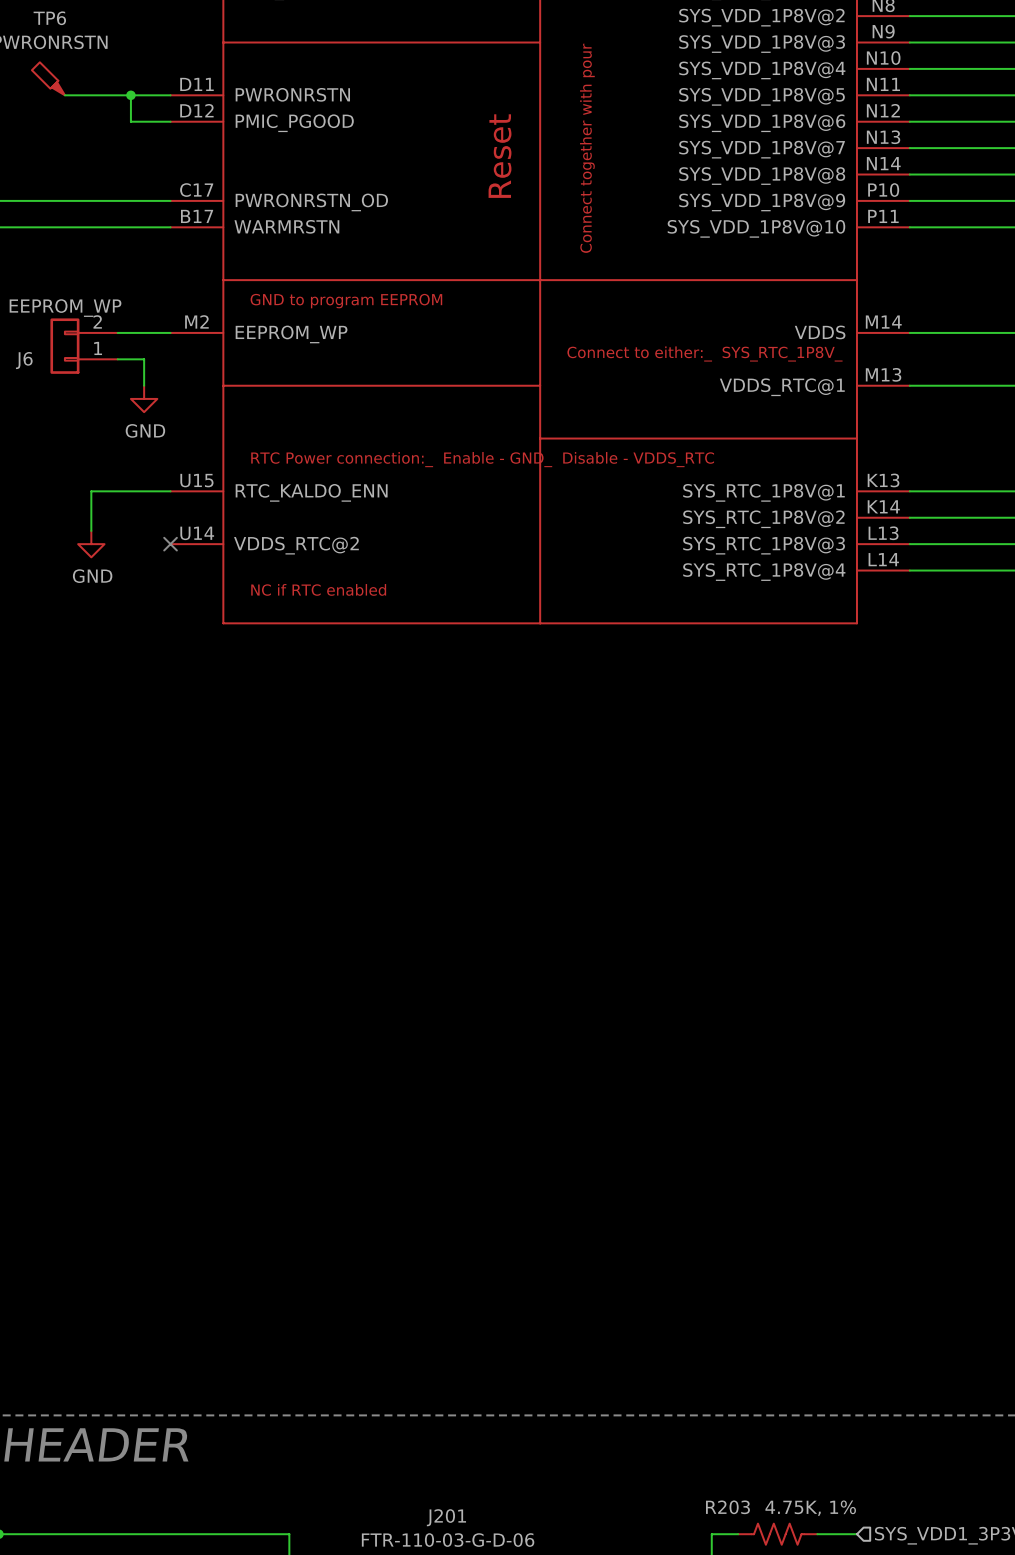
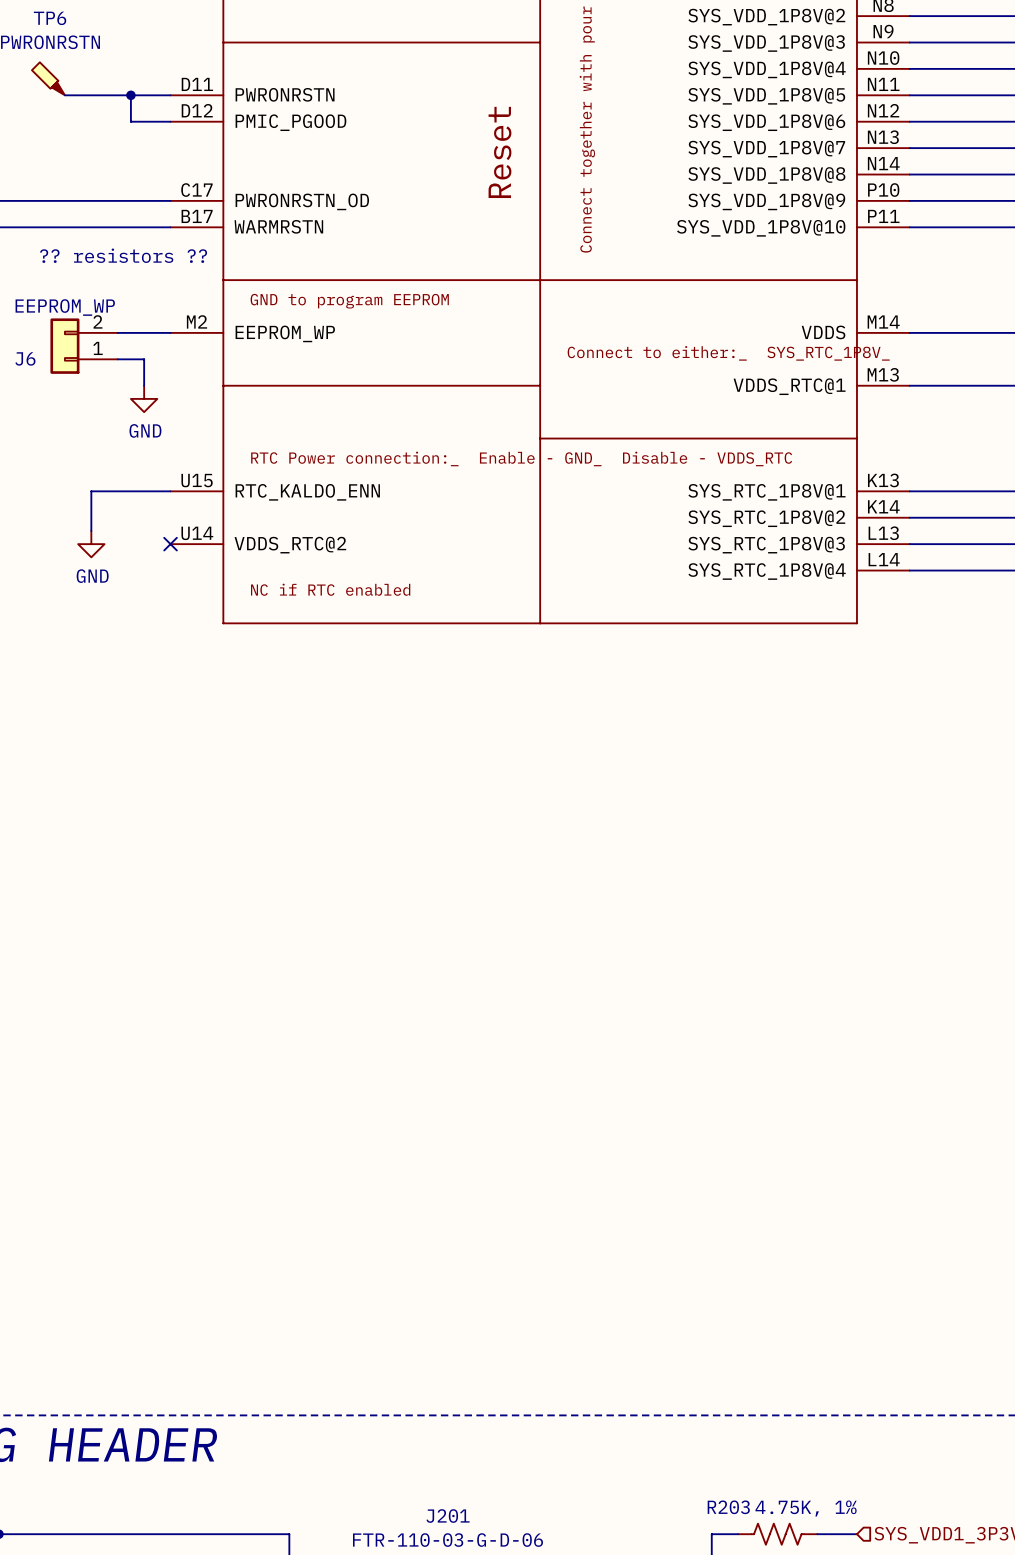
text: none -> ?? resistors ?? (123, 255)

